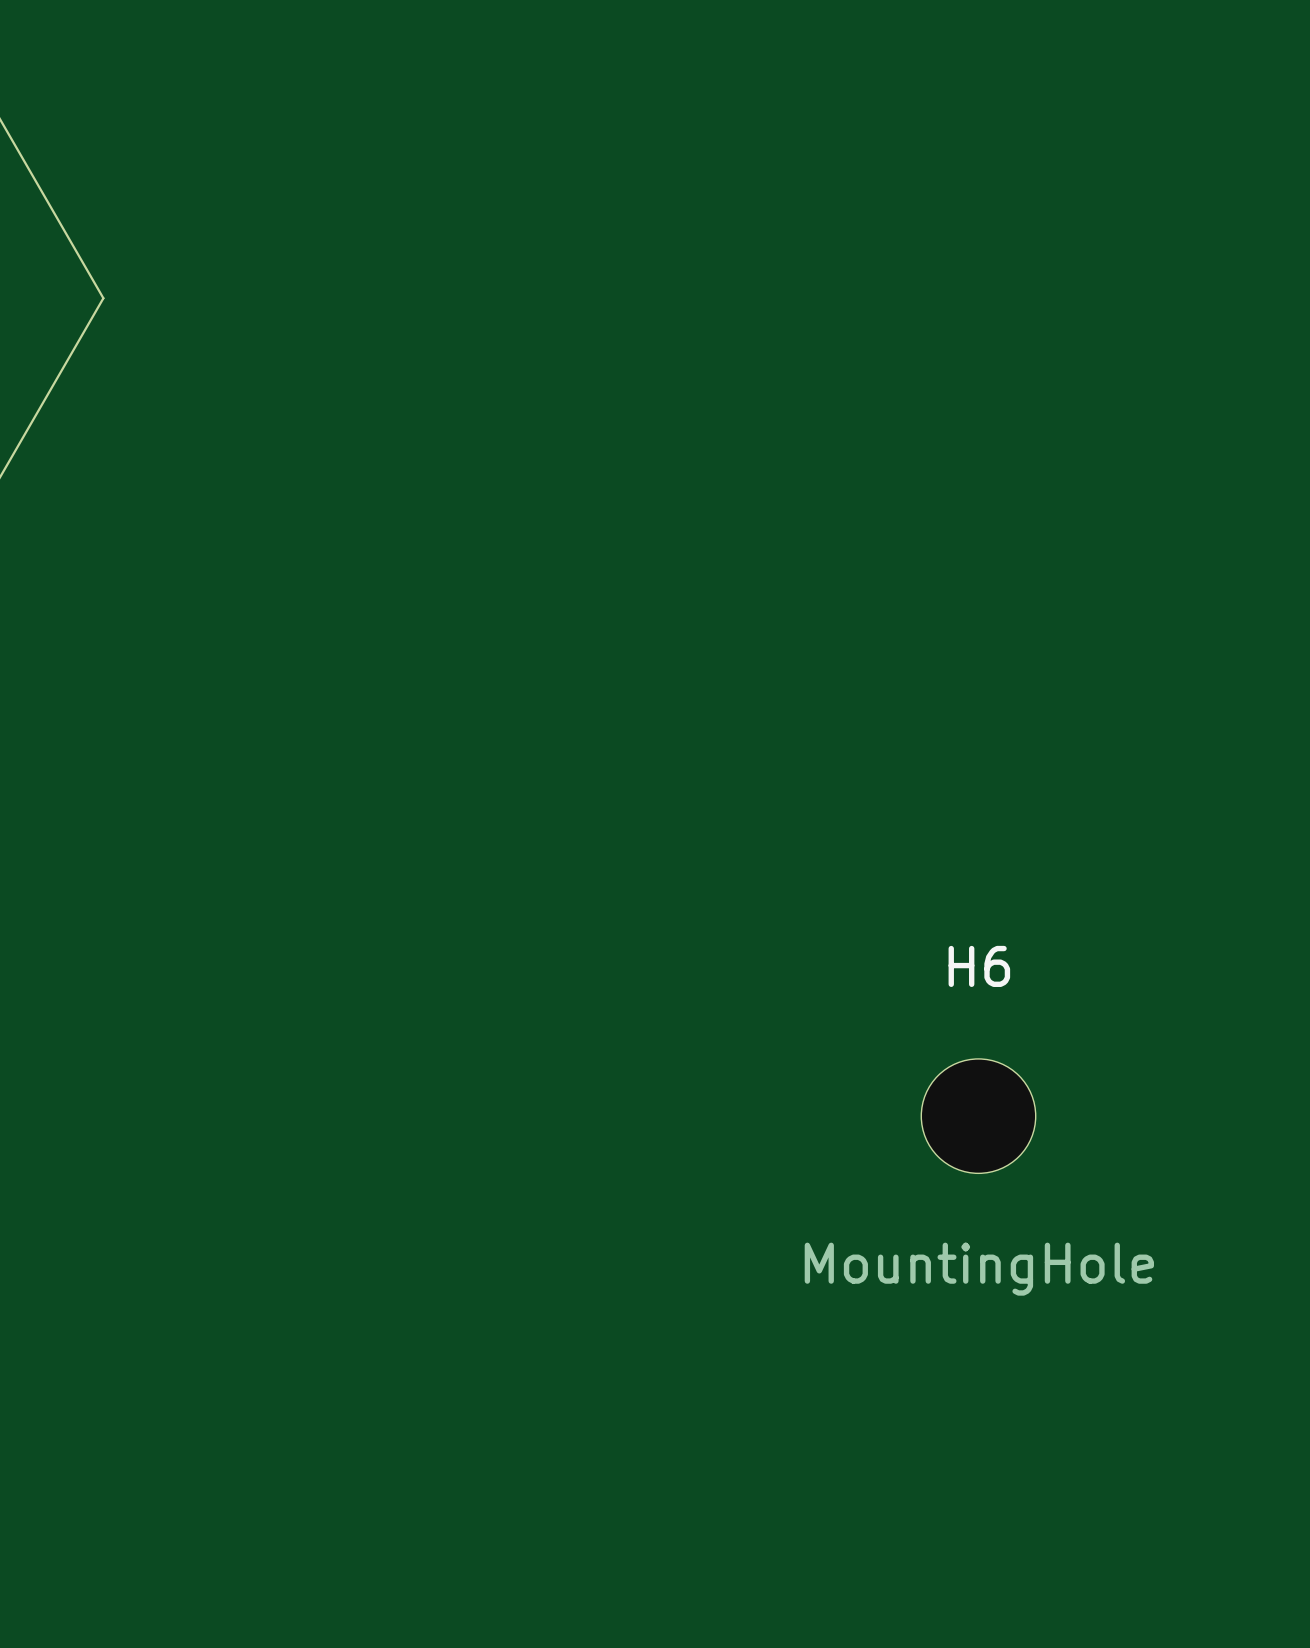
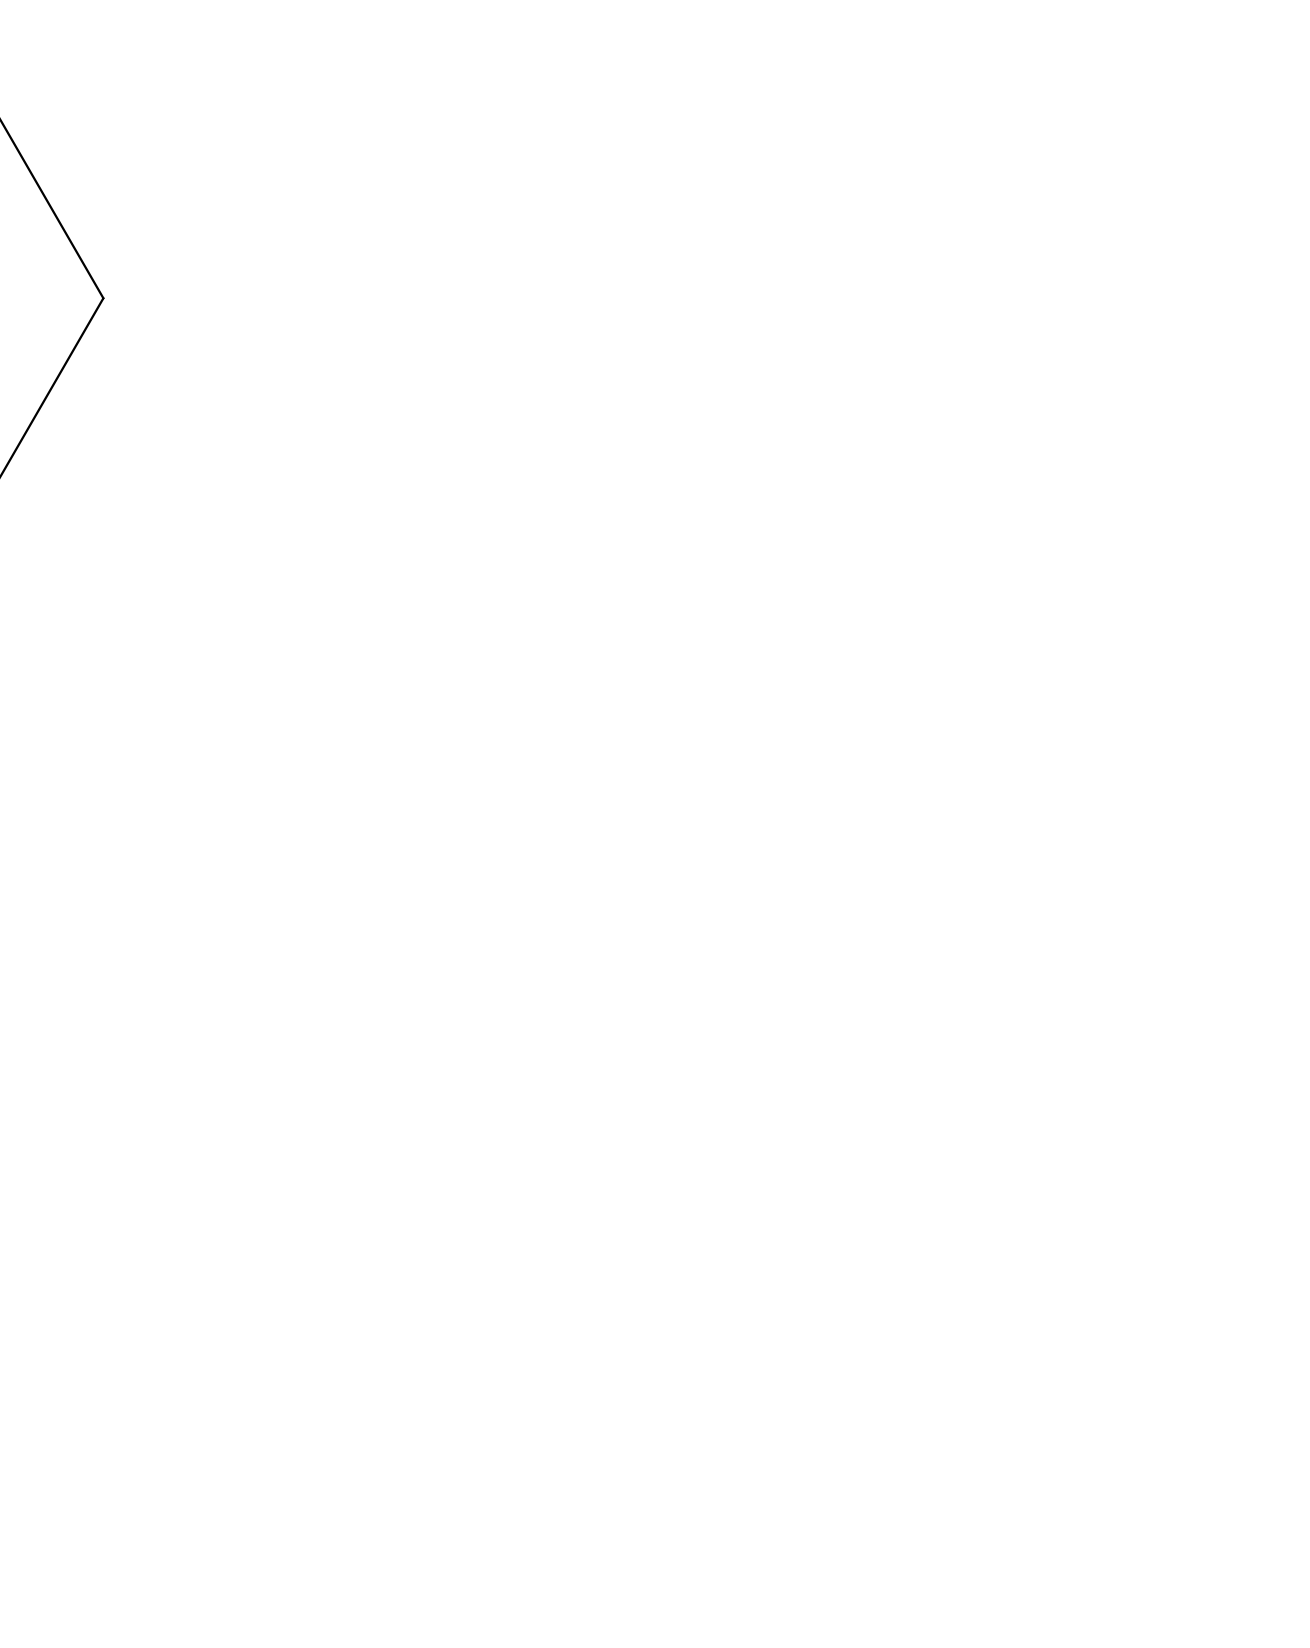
H6: MountingHole (978, 1116) -> none

